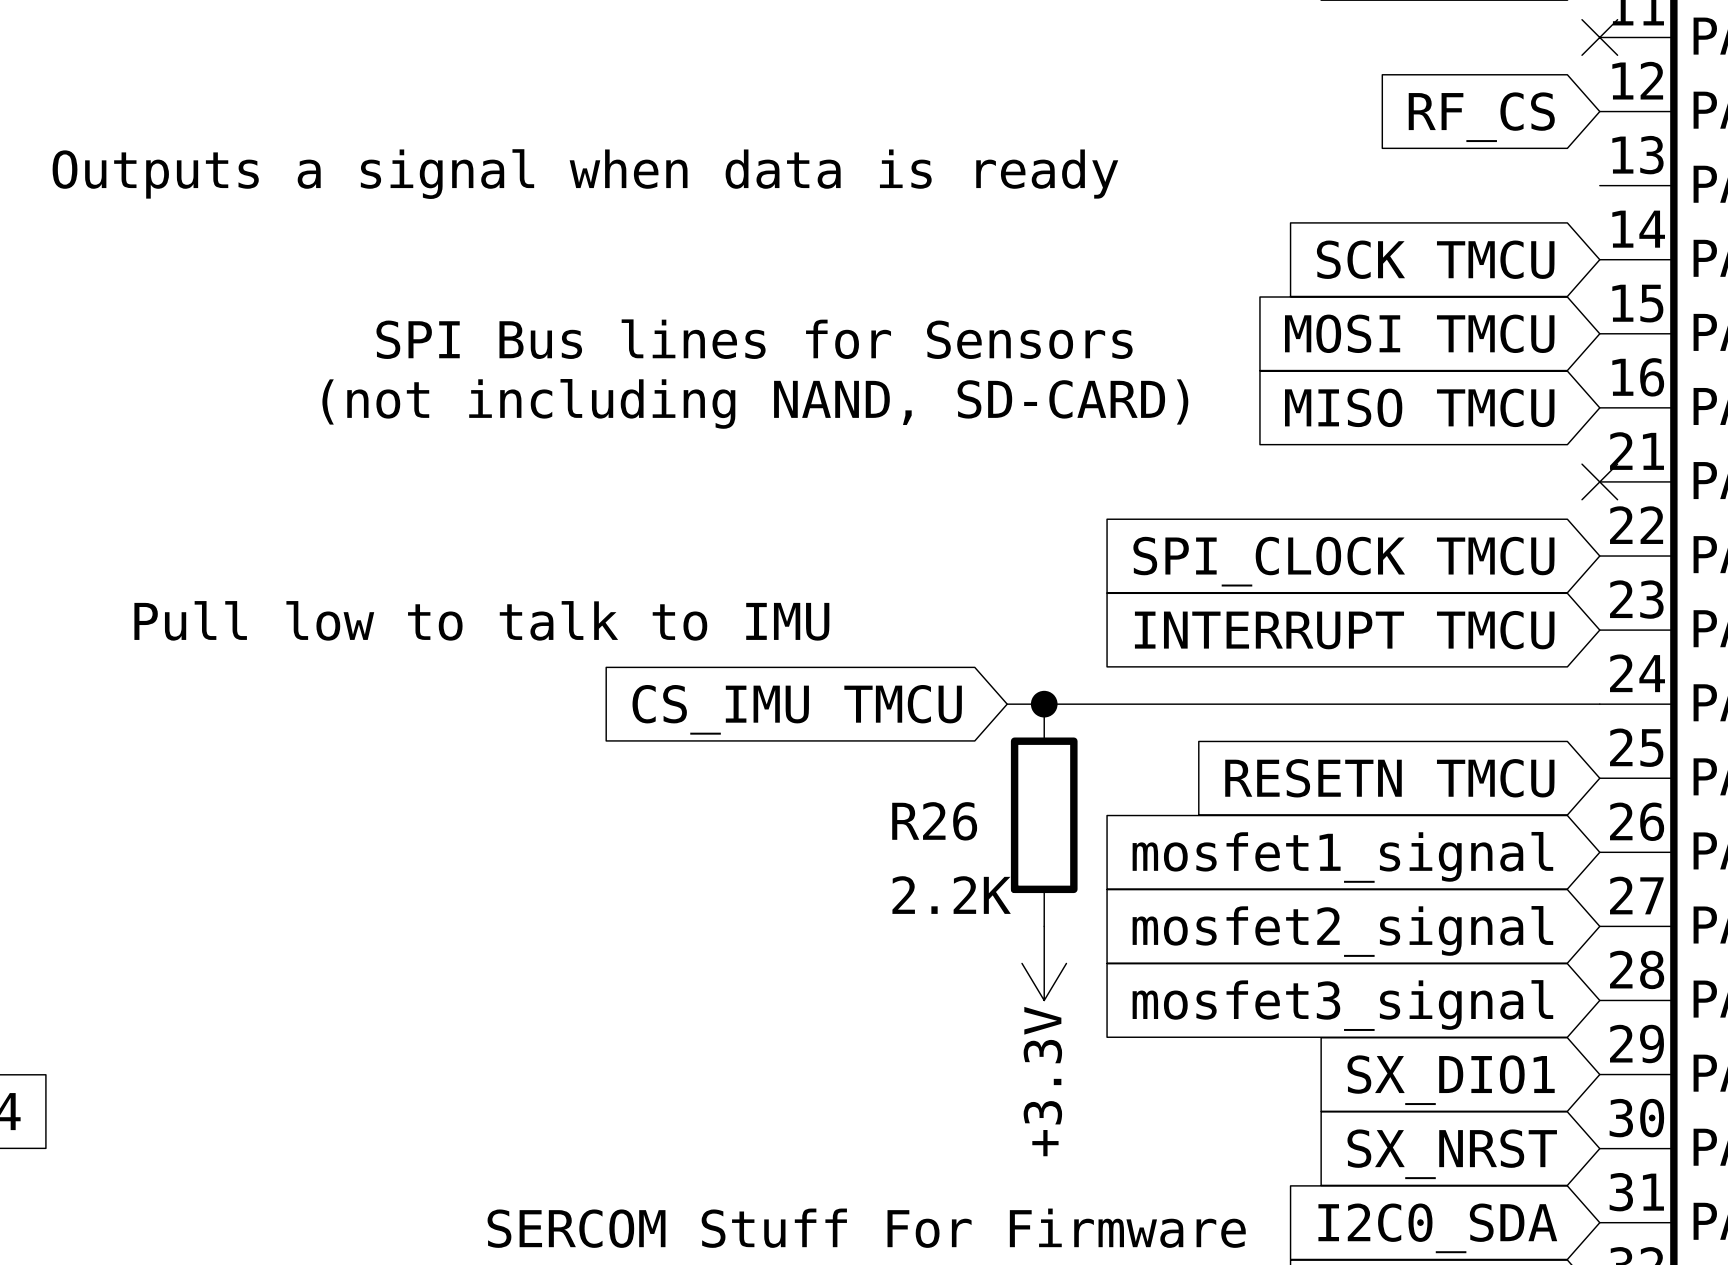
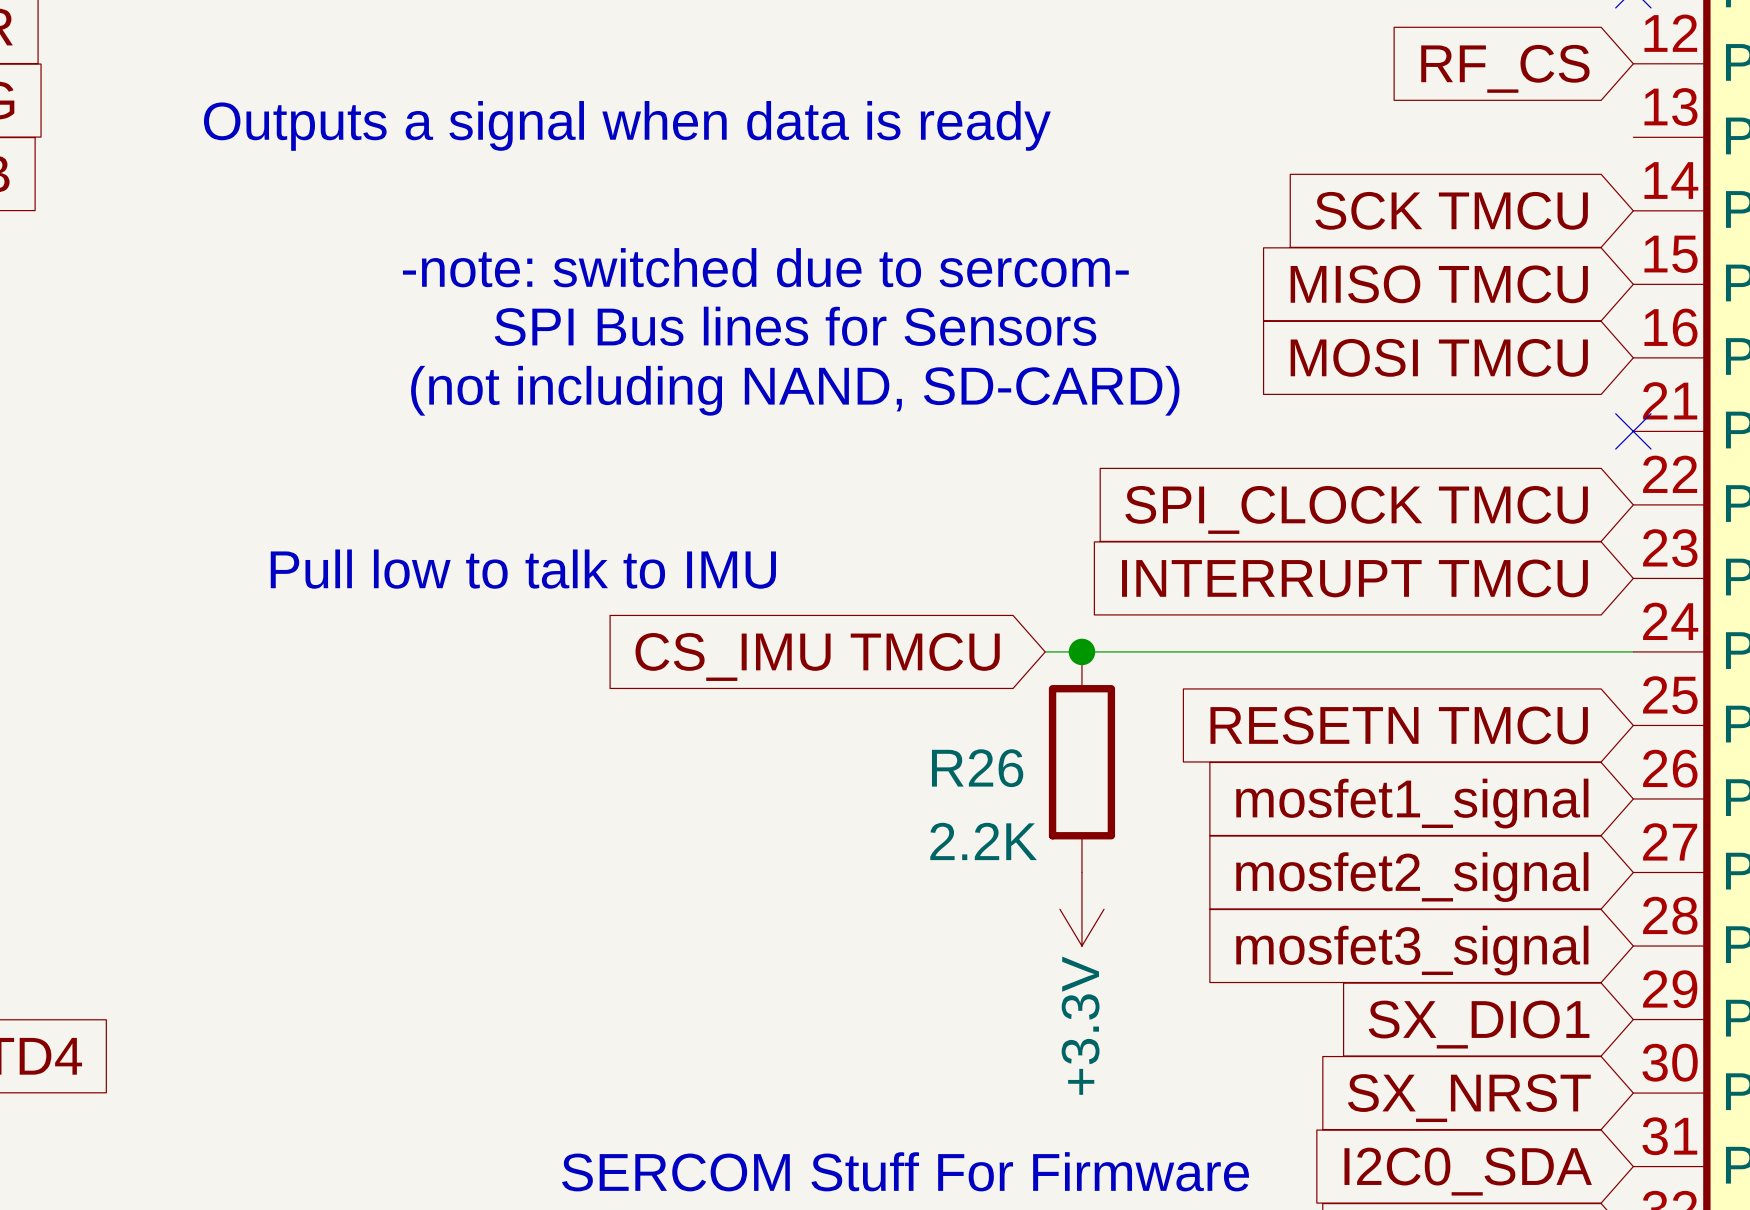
text: none -> -note: switched due to sercom- (765, 267)
global label: MOSI TMCU (1419, 333) -> MISO TMCU (1439, 284)
text position: SPI Bus lines for Sensors (754, 339) -> SPI Bus lines for Sensors (795, 326)
text position: (not including NAND, SD-CARD) (755, 403) -> (not including NAND, SD-CARD) (795, 390)
global label: MISO TMCU (1419, 407) -> MOSI TMCU (1439, 357)

